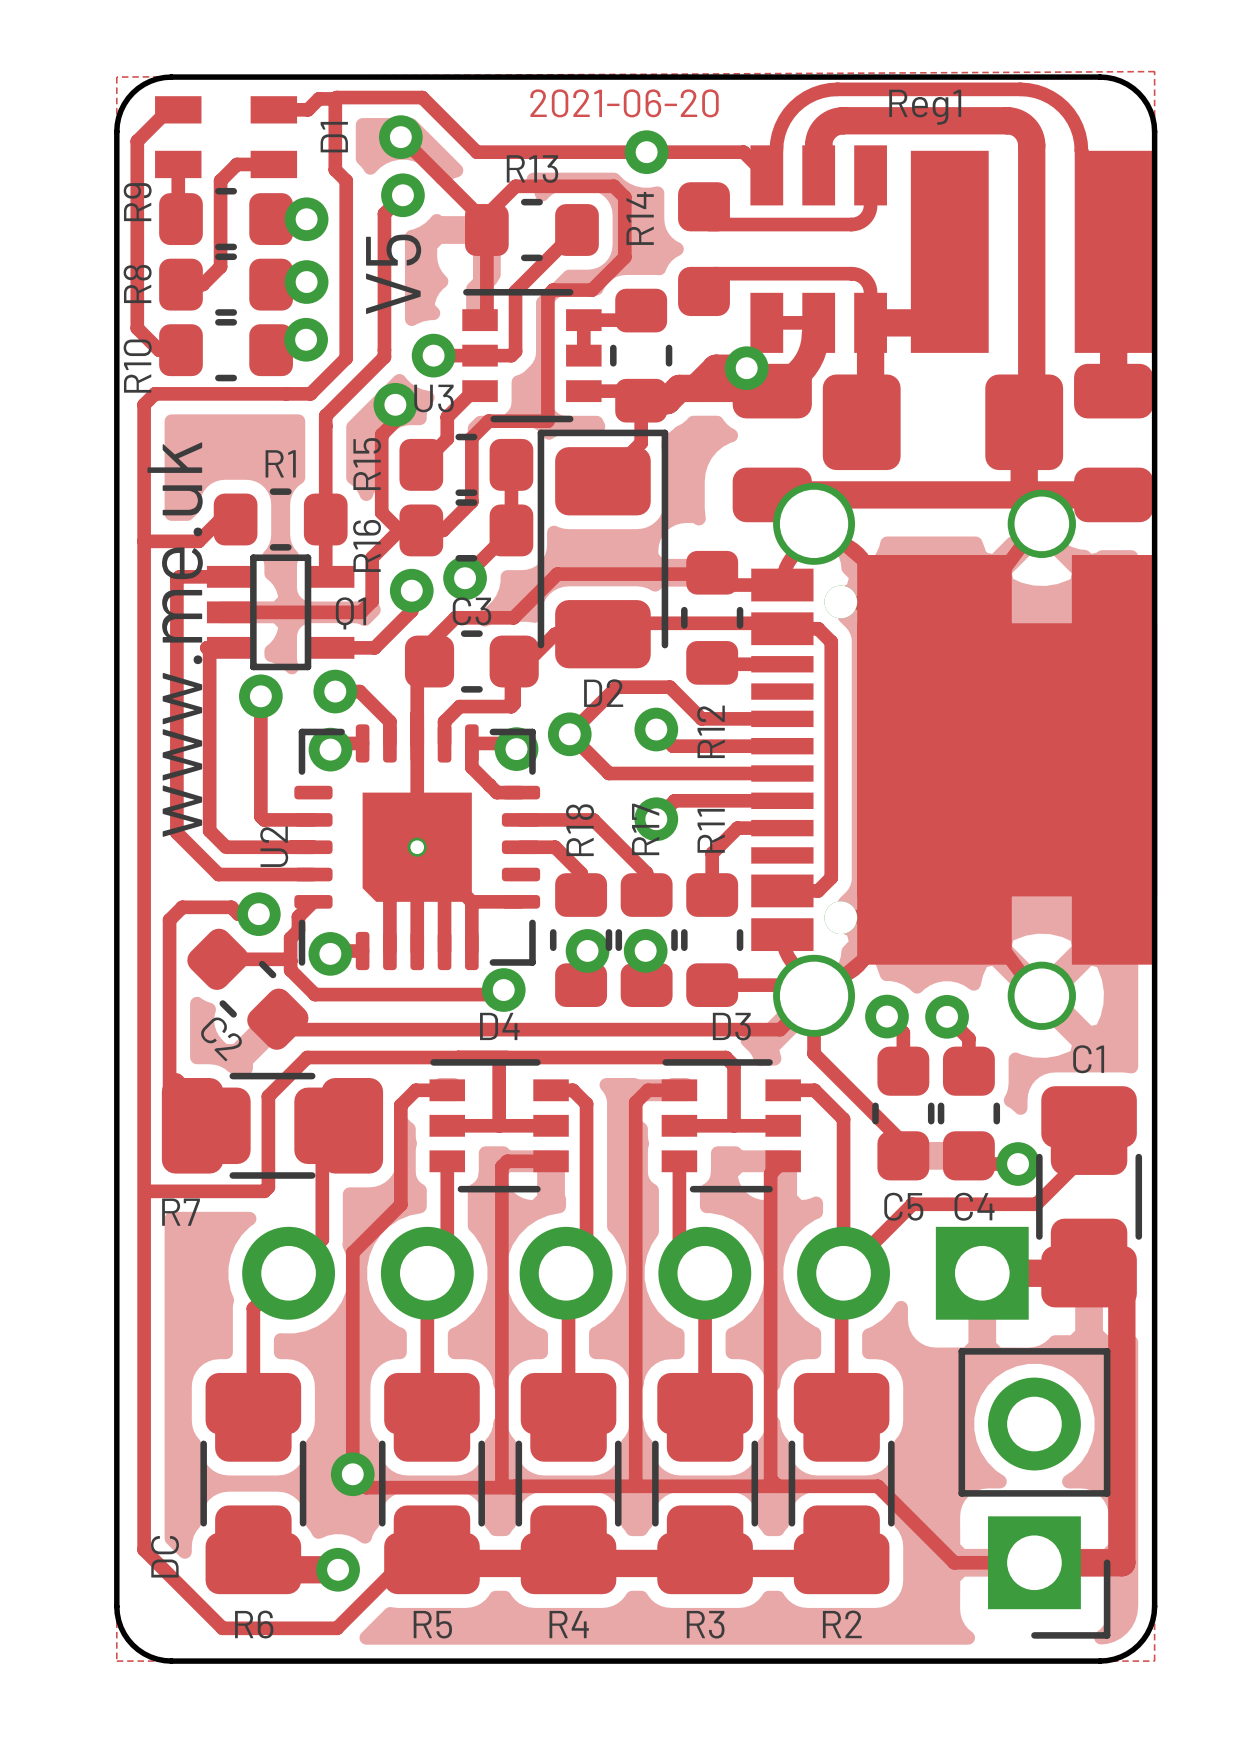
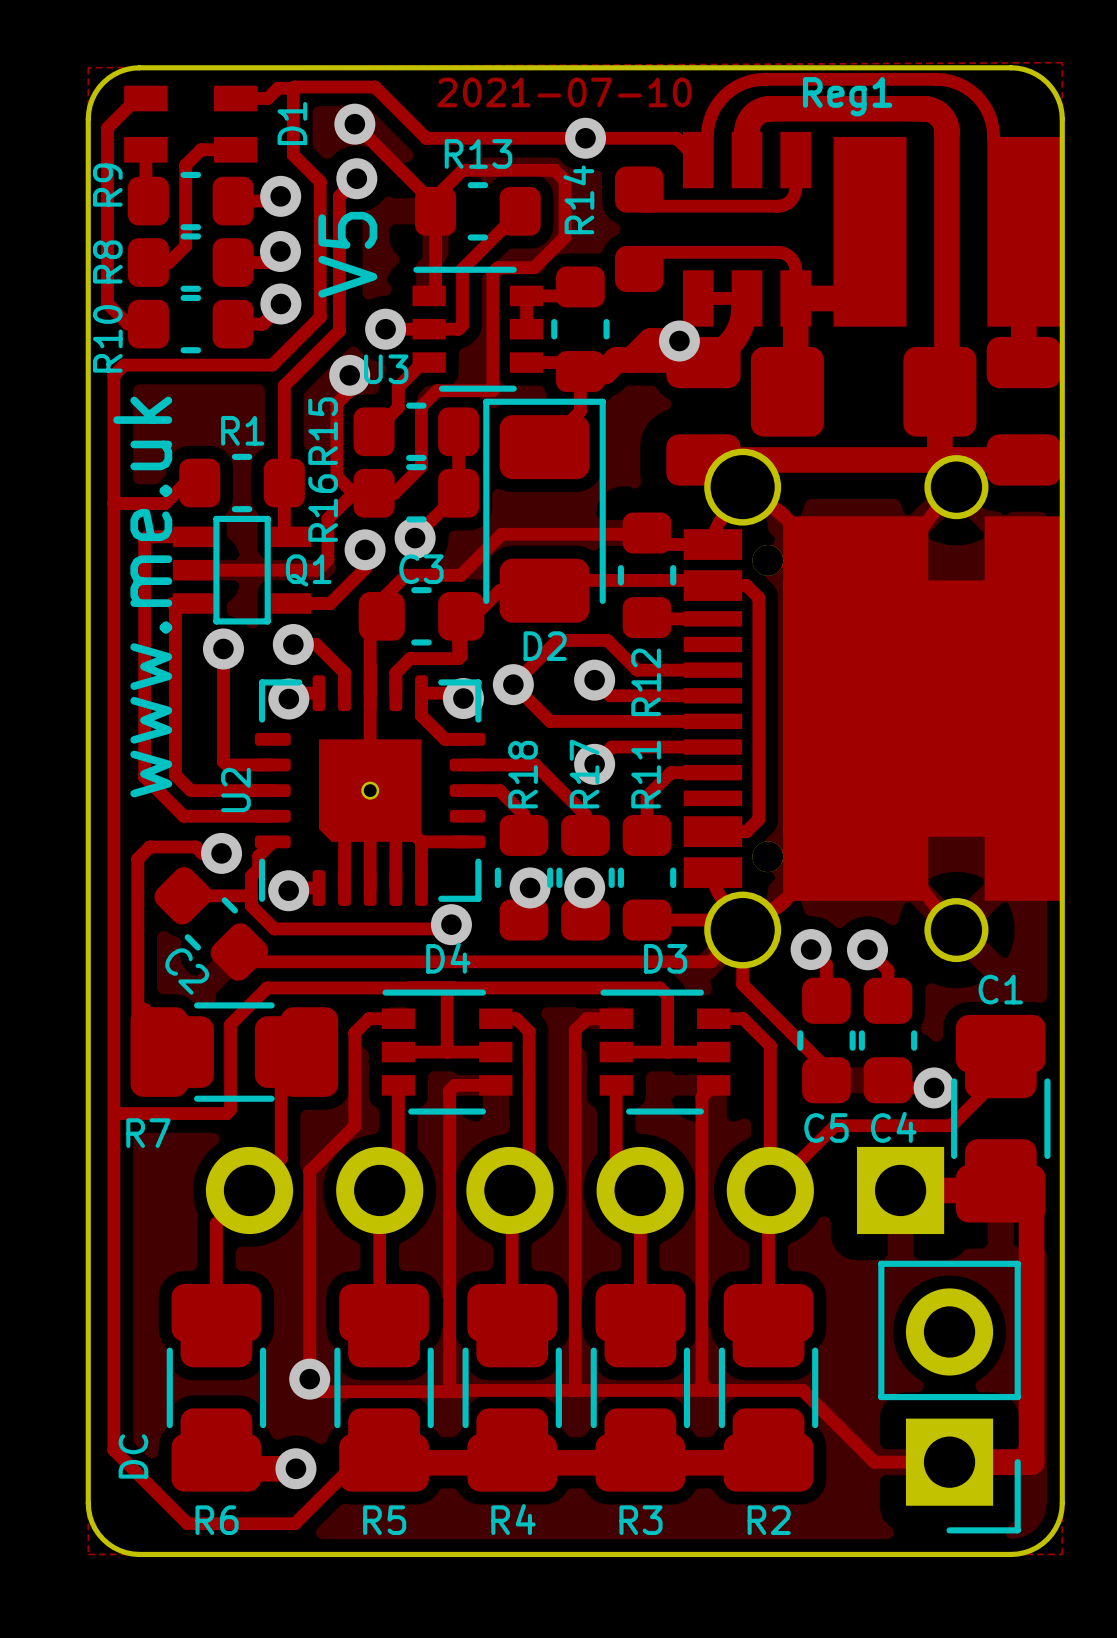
text: 2021-06-20 (624, 103) -> 2021-07-10 (564, 92)
track: (346, 180) (346, 358) (310, 393) -> (303, 165) (320, 181) (320, 317) (272, 365) (270, 365)
via position: (306, 219) -> (280, 196)
via position: (306, 282) -> (280, 251)
via position: (306, 339) -> (280, 303)

